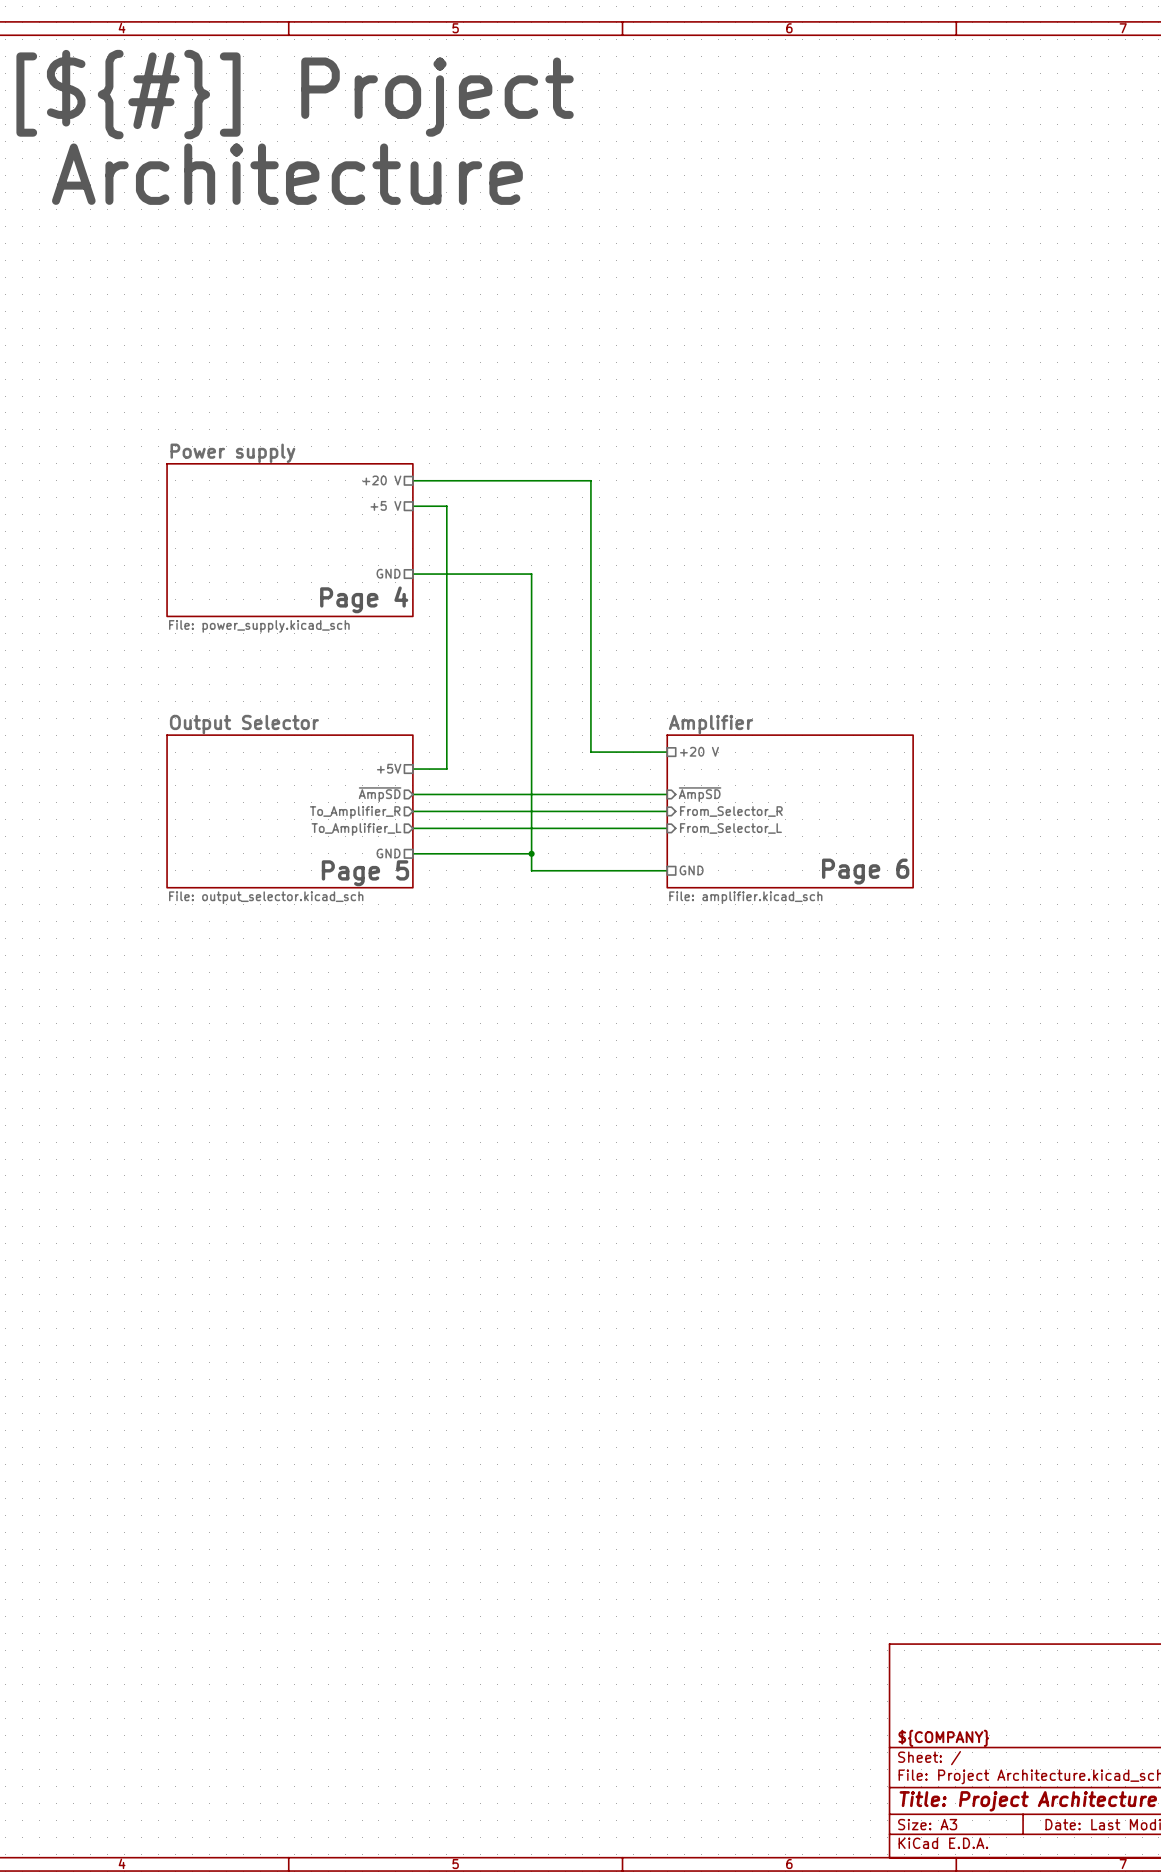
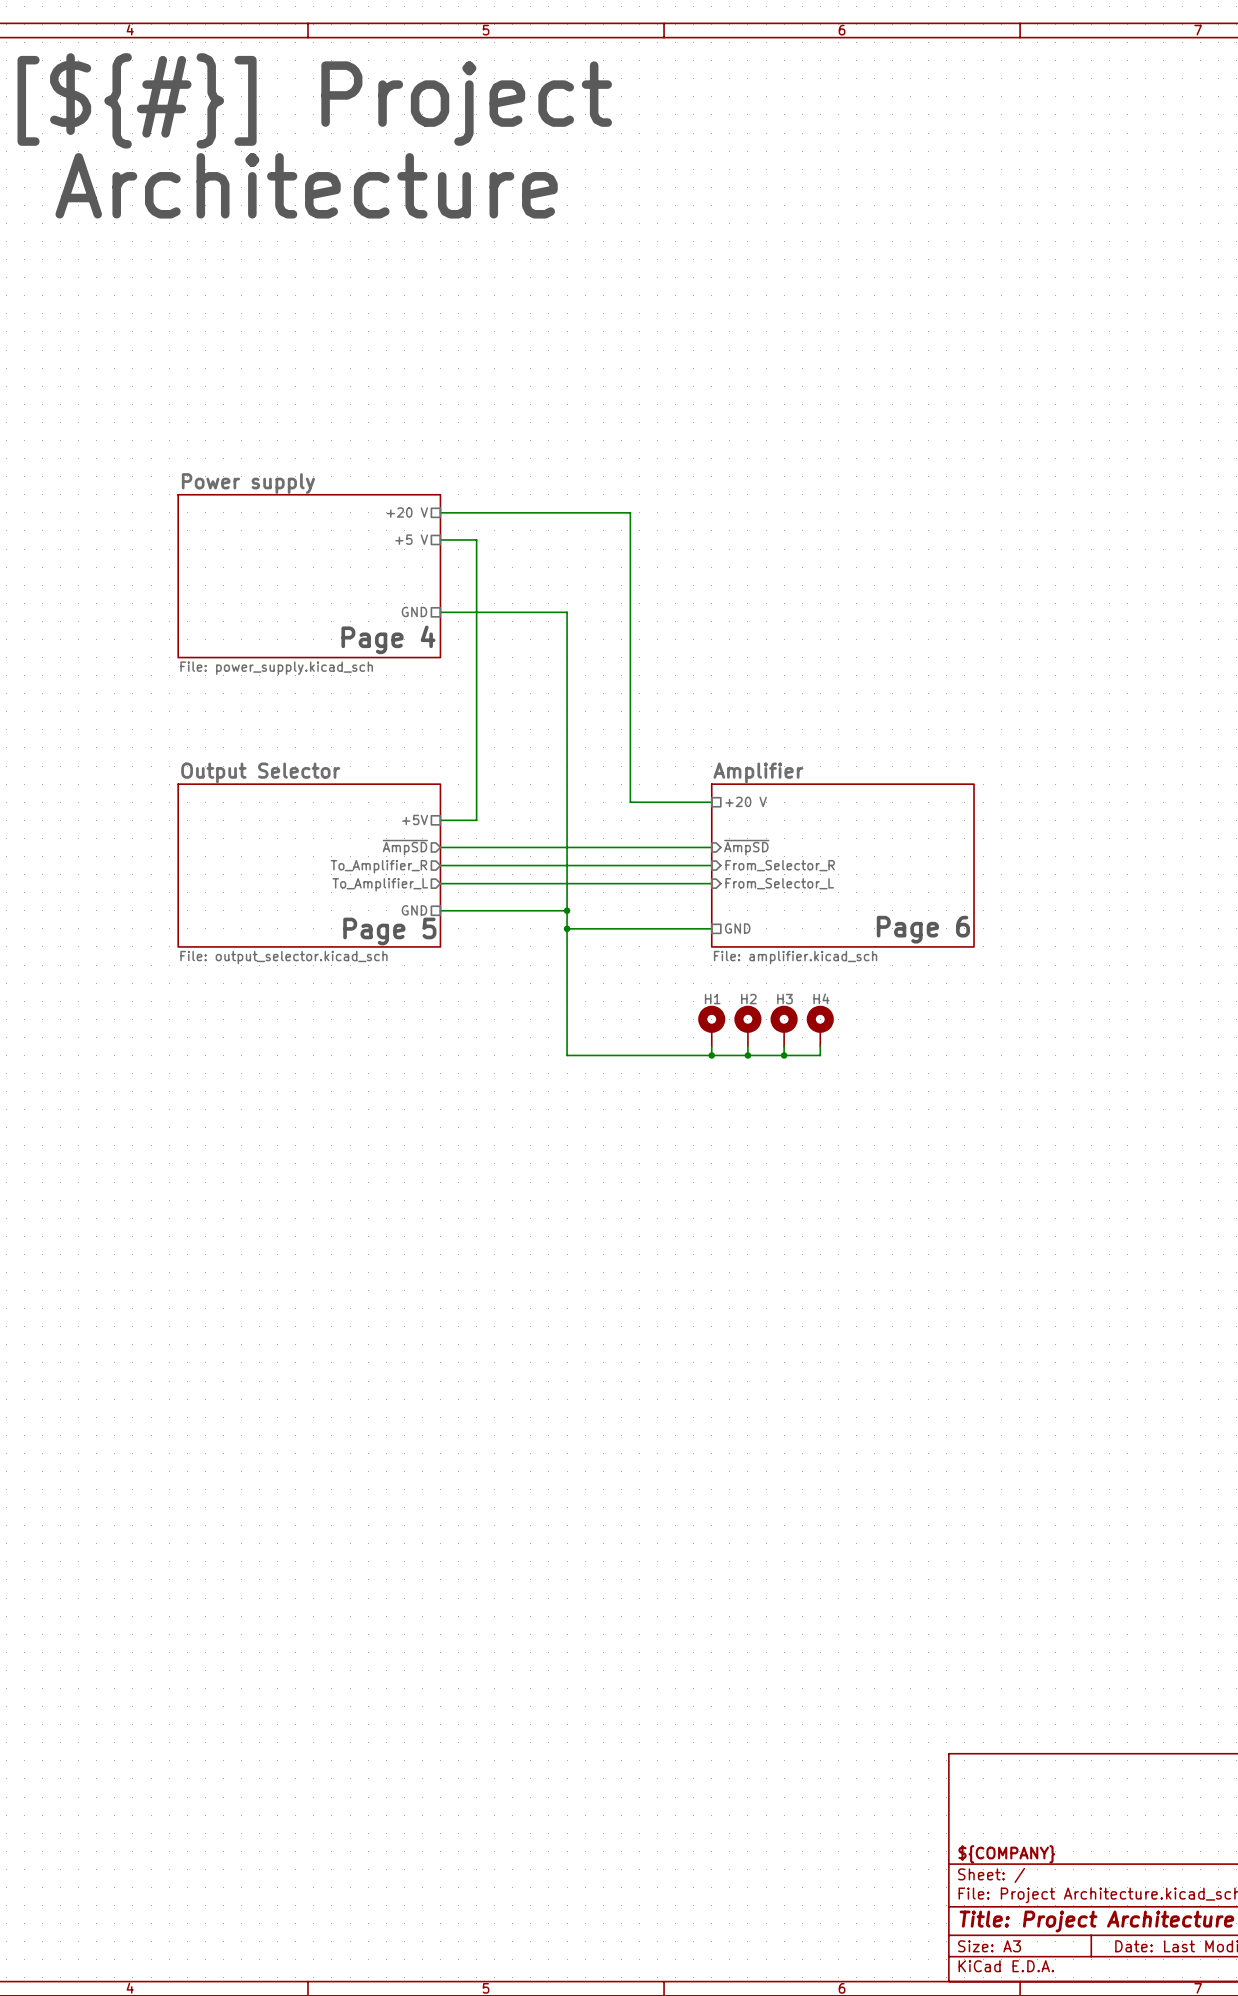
wire: none -> (567, 928) (567, 1055) (820, 1055) (820, 1046)
junction: none -> (567, 928)
H1: none -> (711, 1026)
H2: none -> (747, 1026)
H3: none -> (784, 1026)
H4: none -> (820, 1026)
wire: none -> (711, 1046) (711, 1055)
wire: none -> (747, 1046) (747, 1055)
wire: none -> (784, 1046) (784, 1055)
junction: none -> (711, 1055)
junction: none -> (747, 1055)
junction: none -> (784, 1055)

